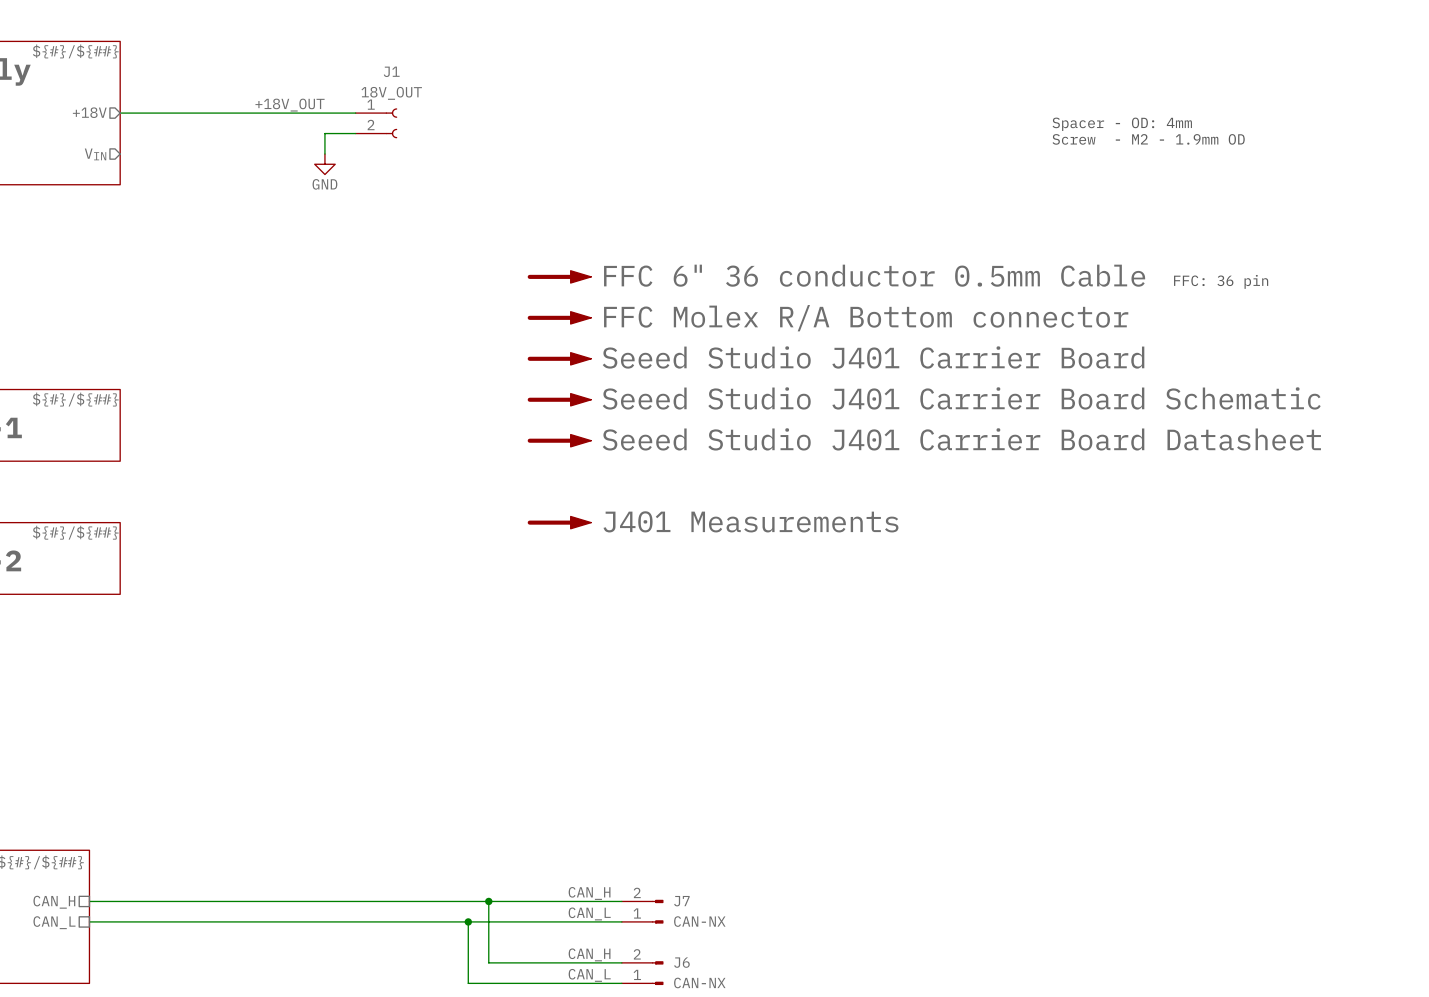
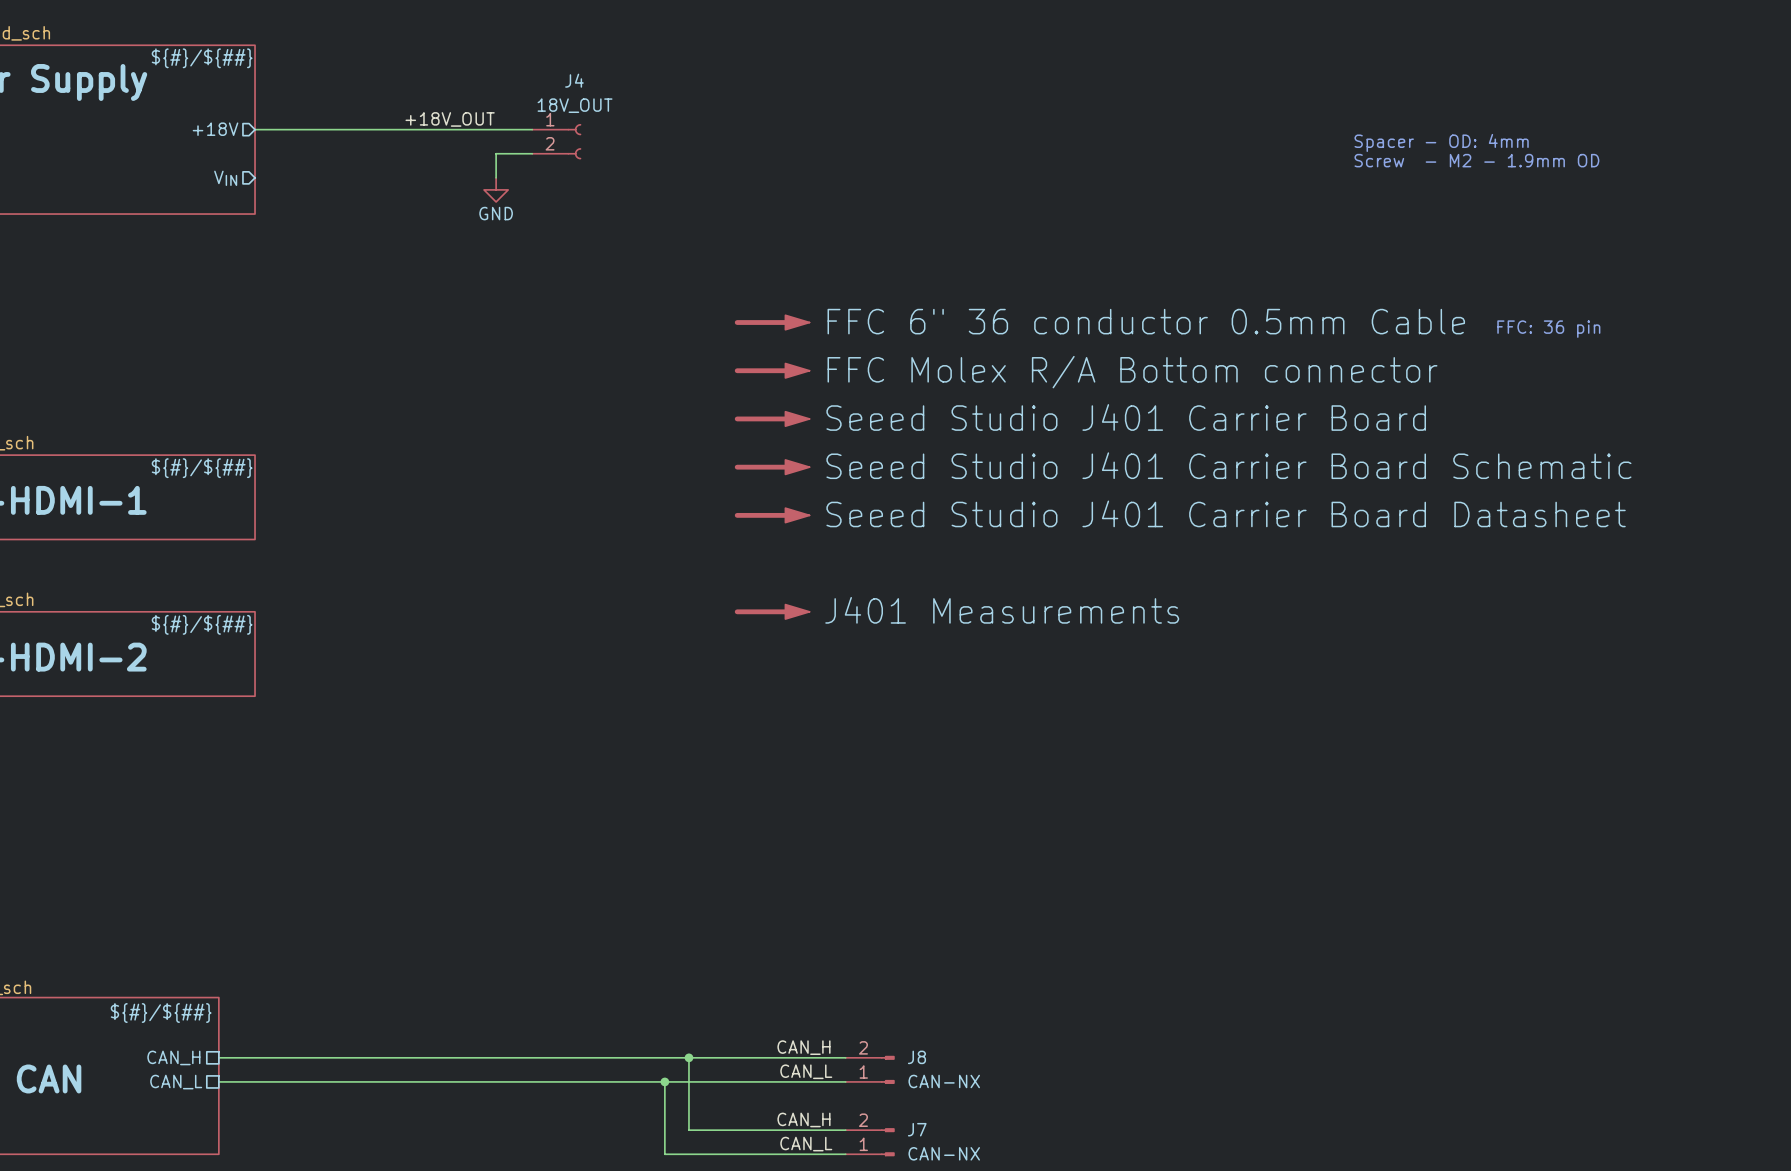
J1 name: J1 (391, 71) -> J4 (574, 80)
J7 name: J7 (681, 901) -> J8 (916, 1057)
J6 name: J6 (681, 962) -> J7 (917, 1129)

